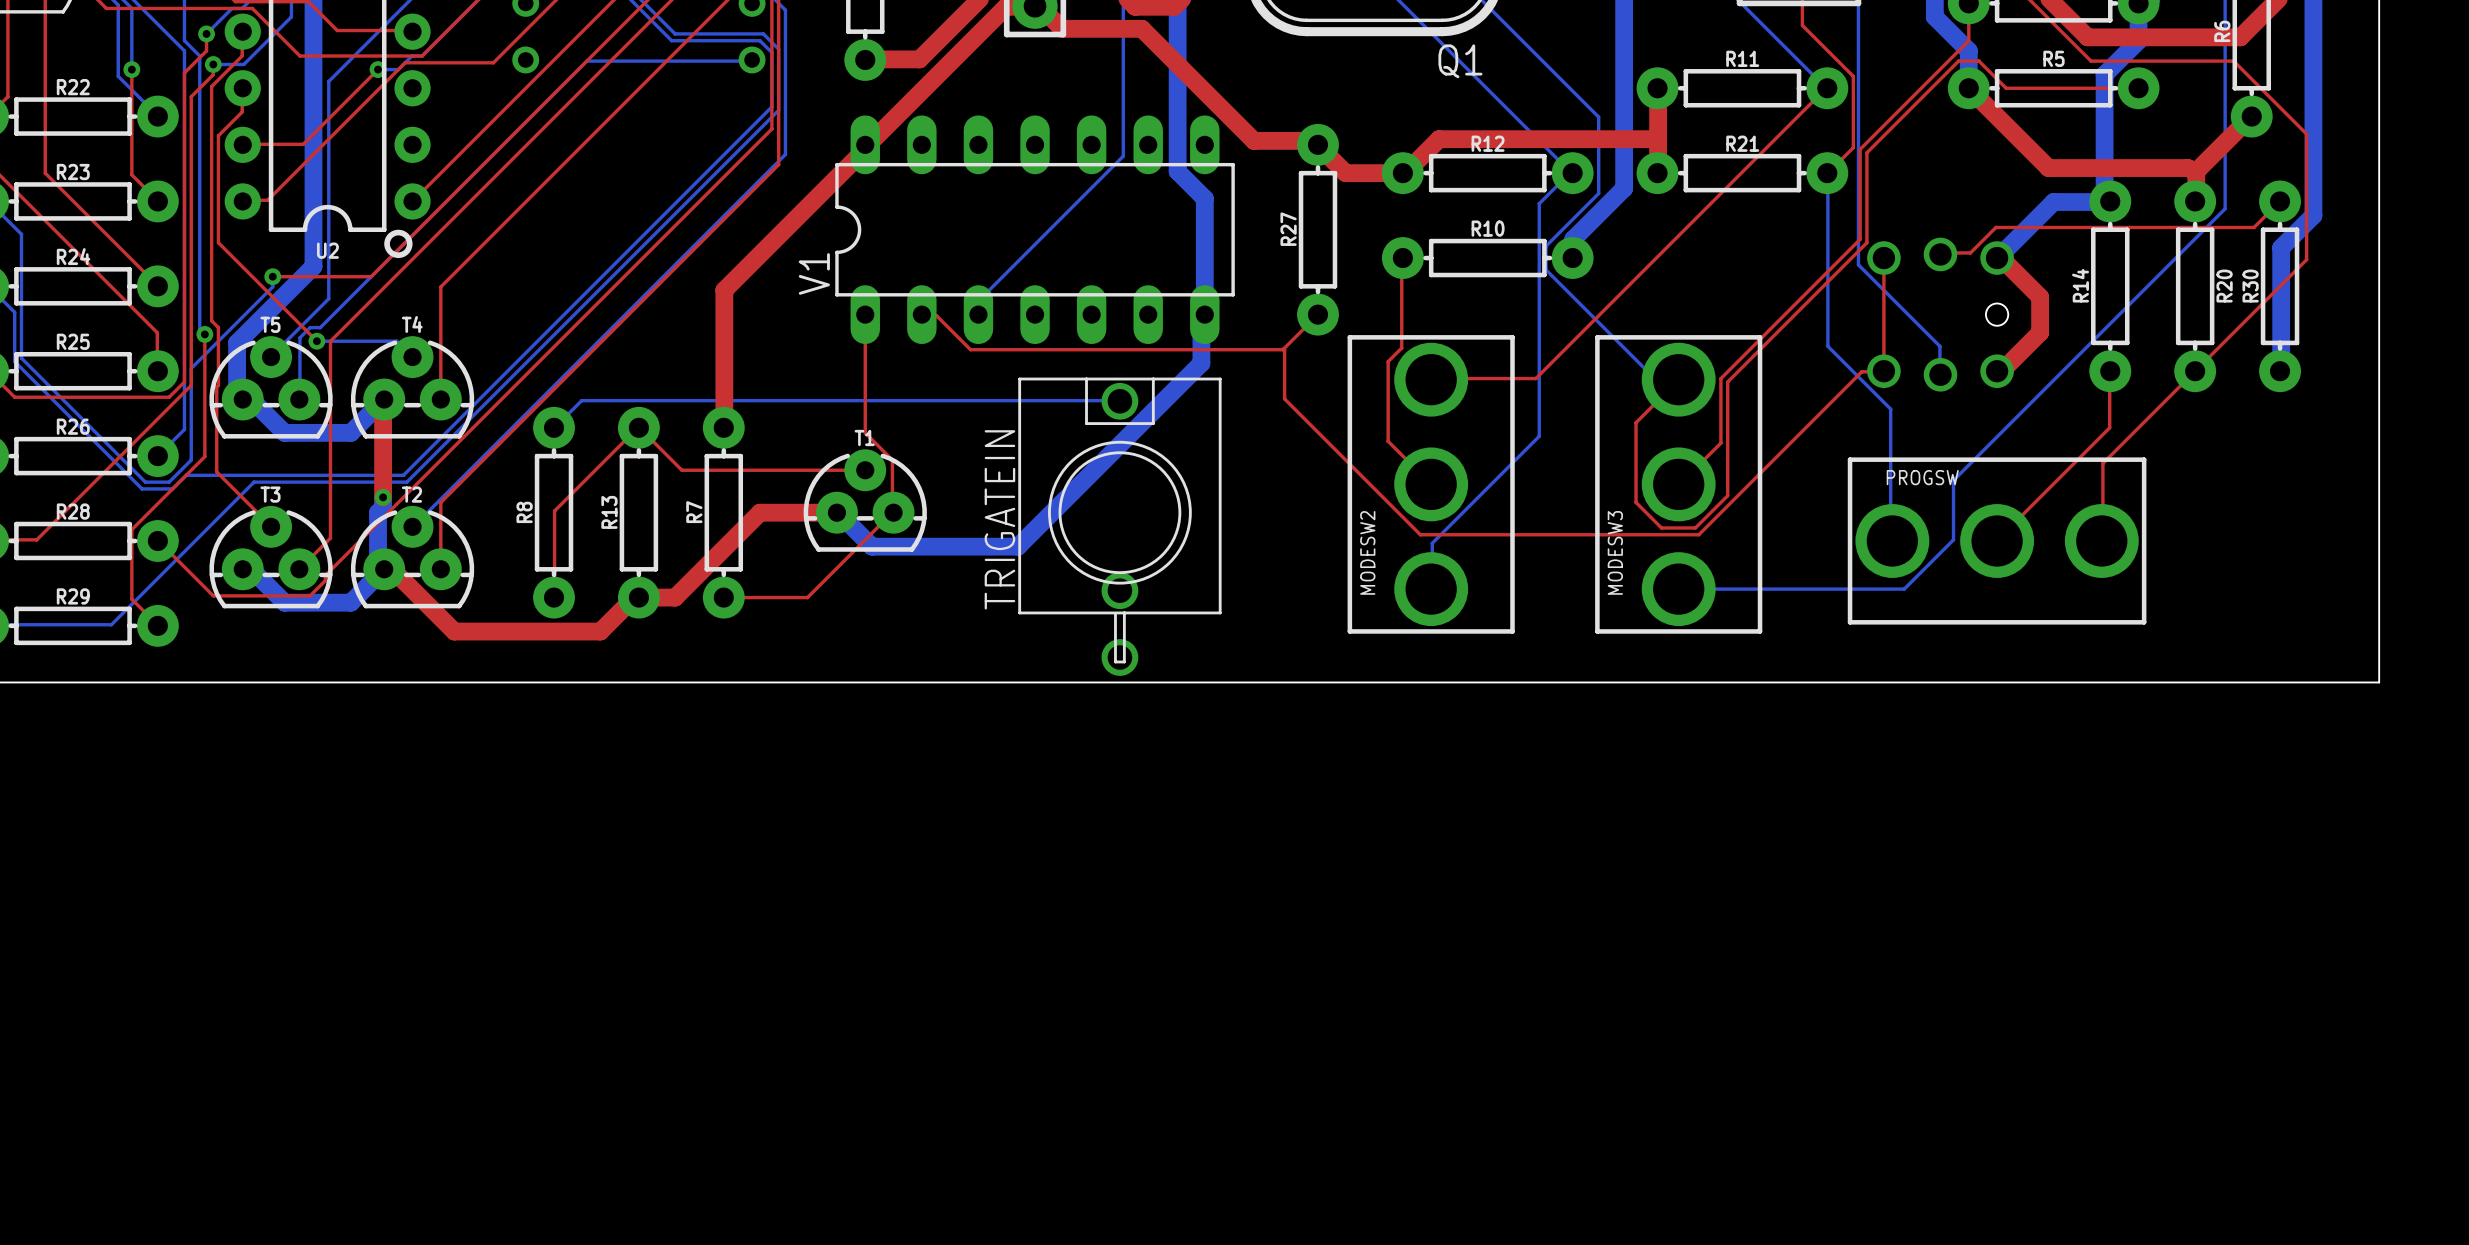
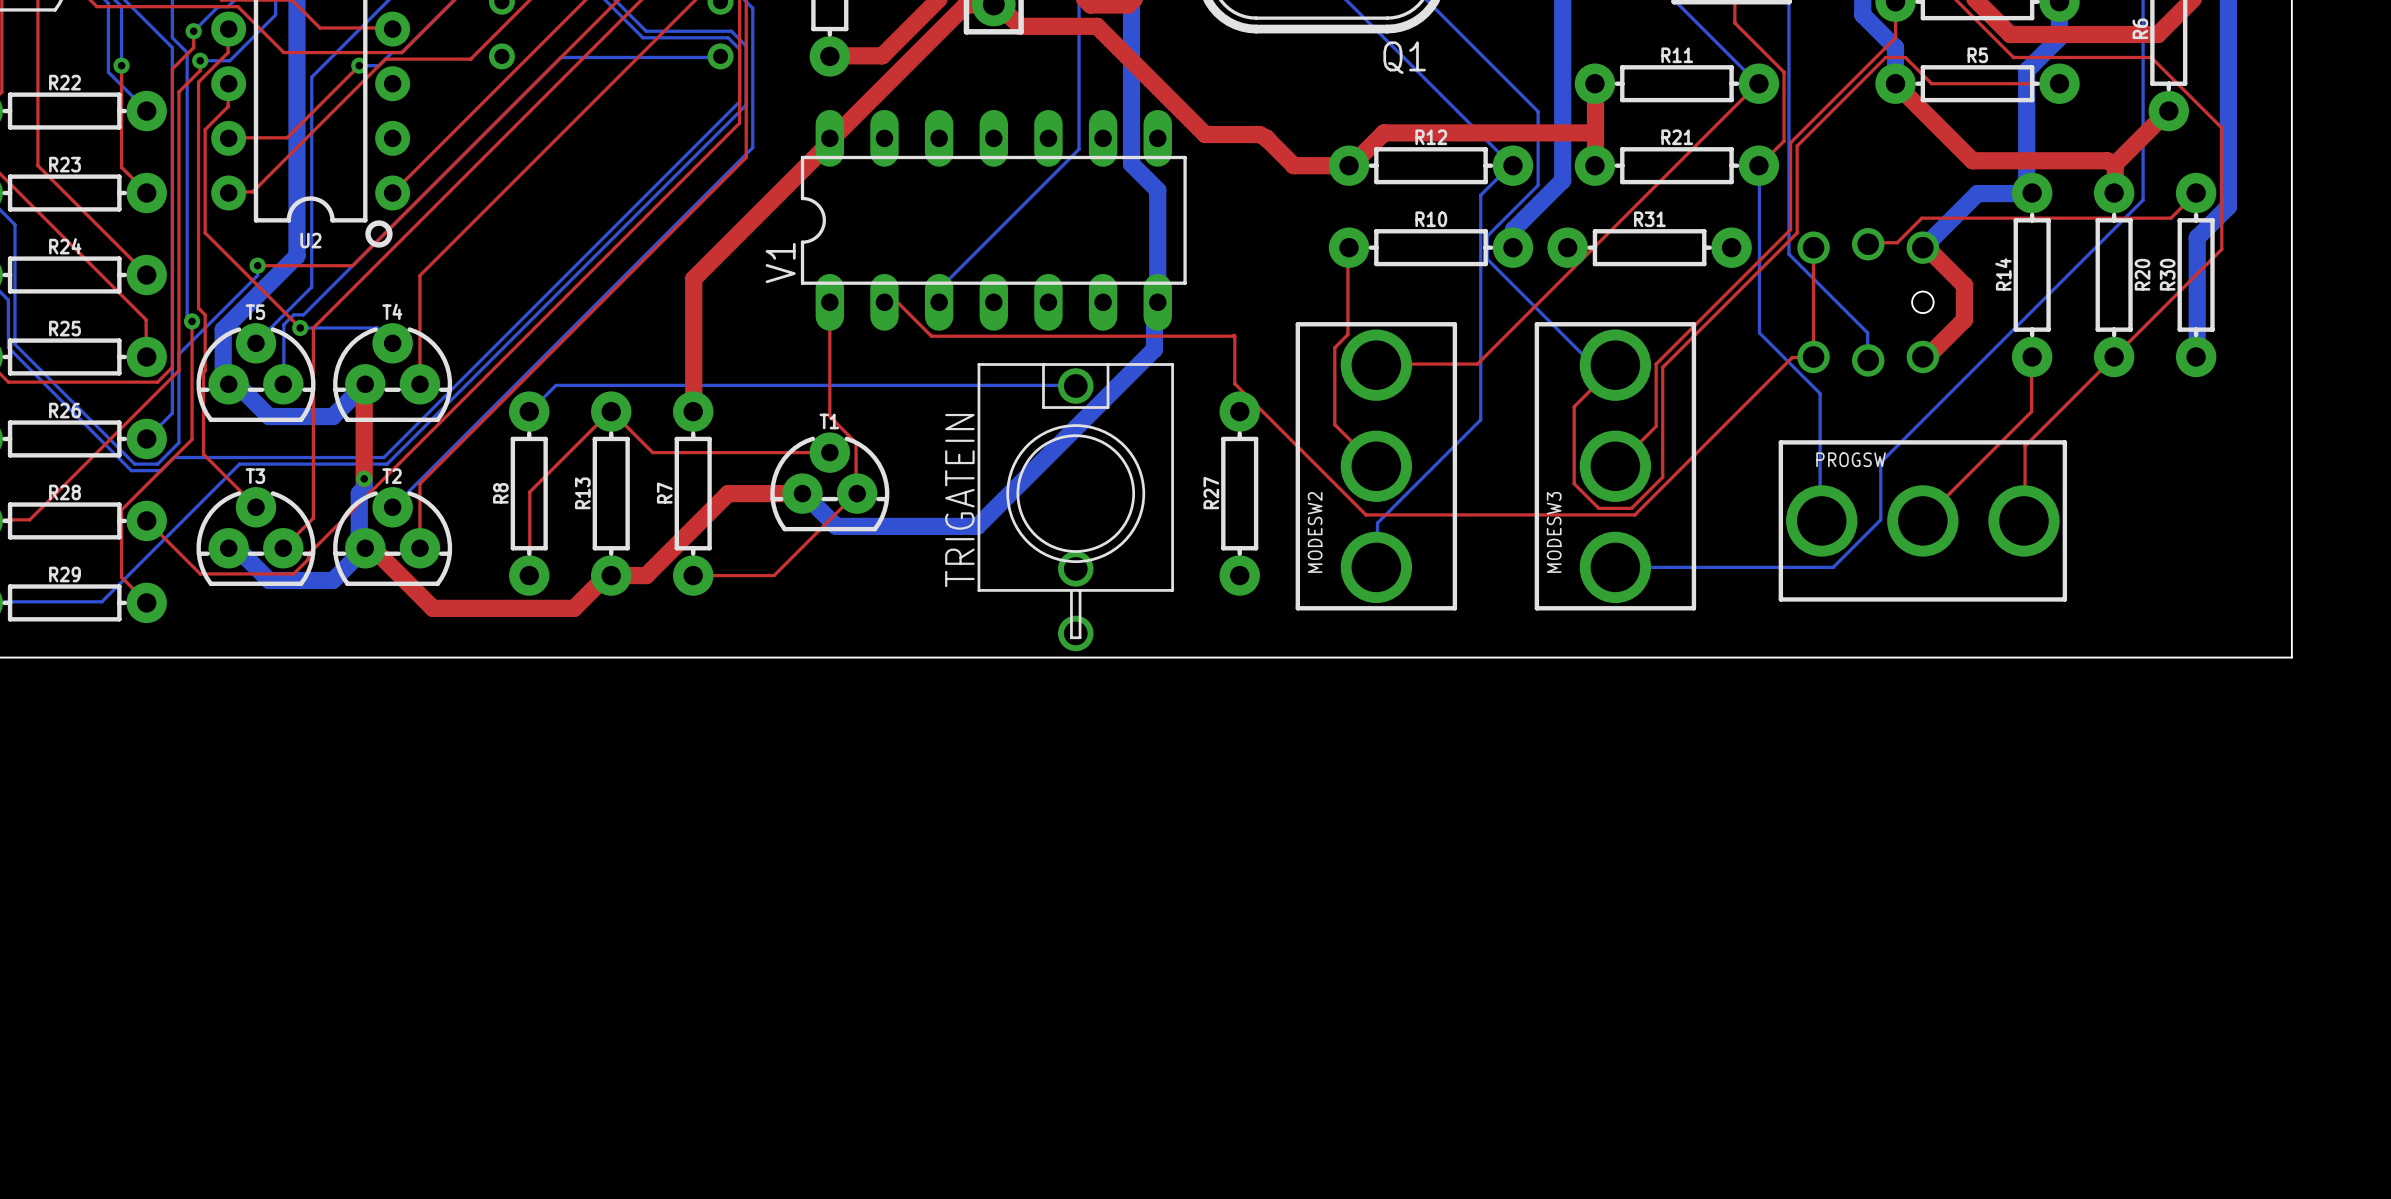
R27 position: (1317, 229) -> (1239, 493)
R31: none -> (1649, 247)
top track: (1317, 314) (1283, 348) -> none

